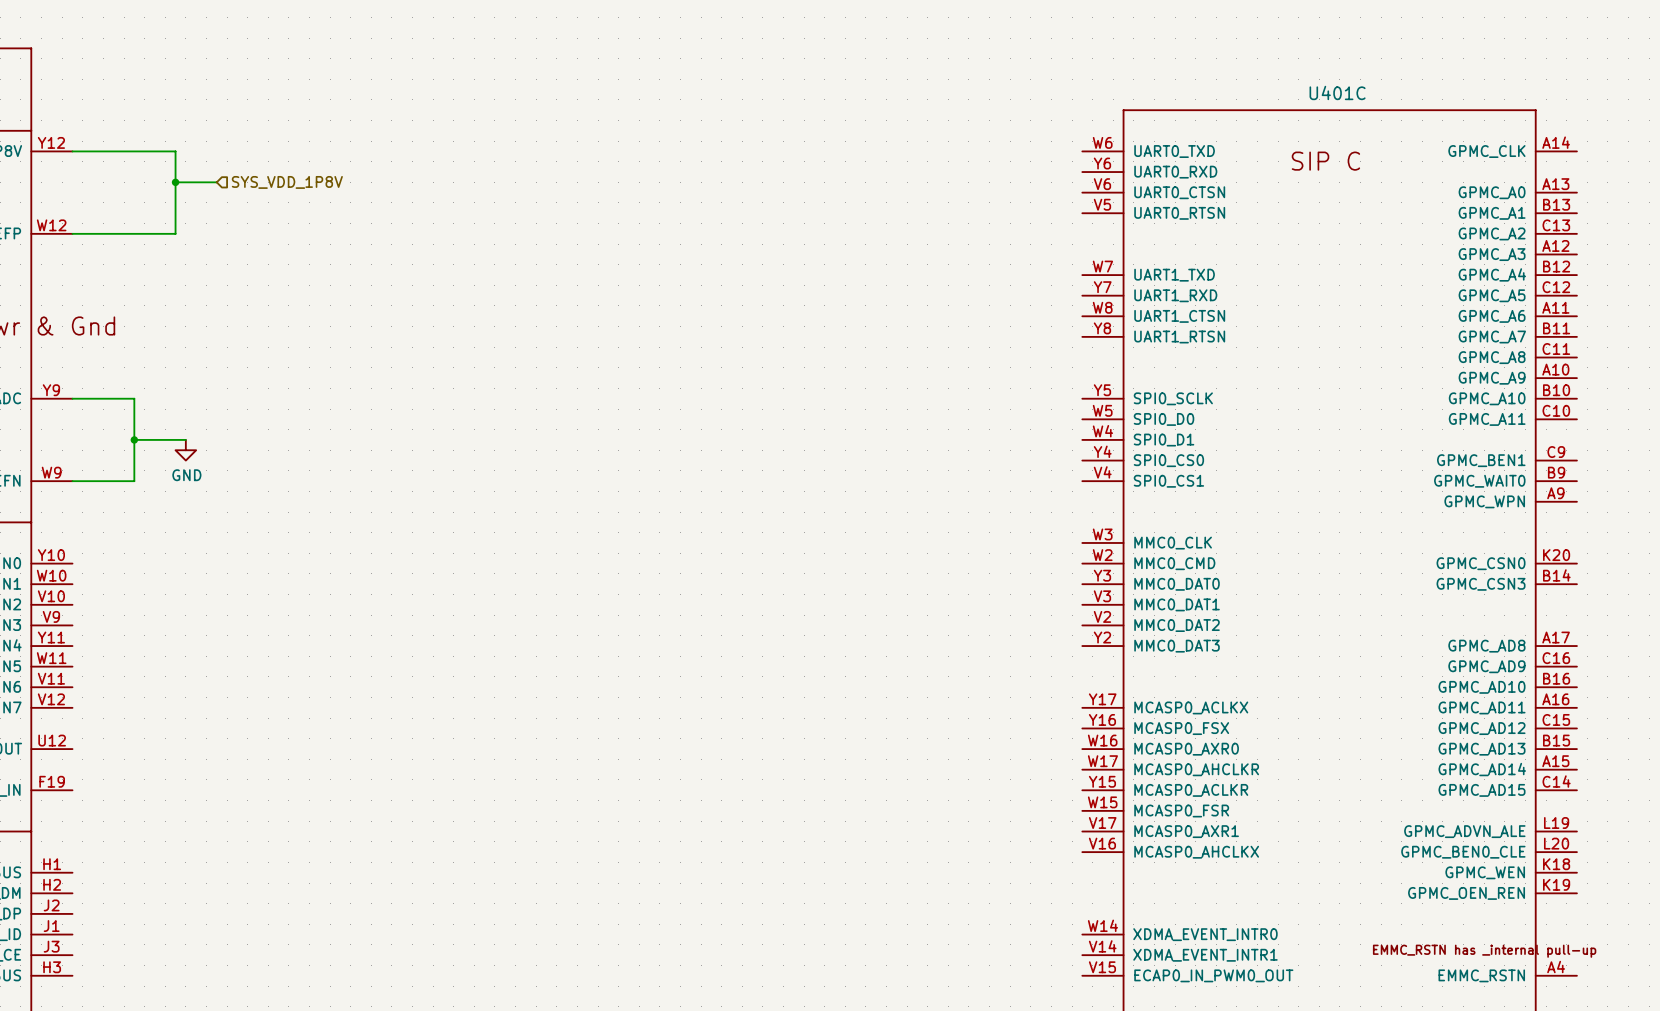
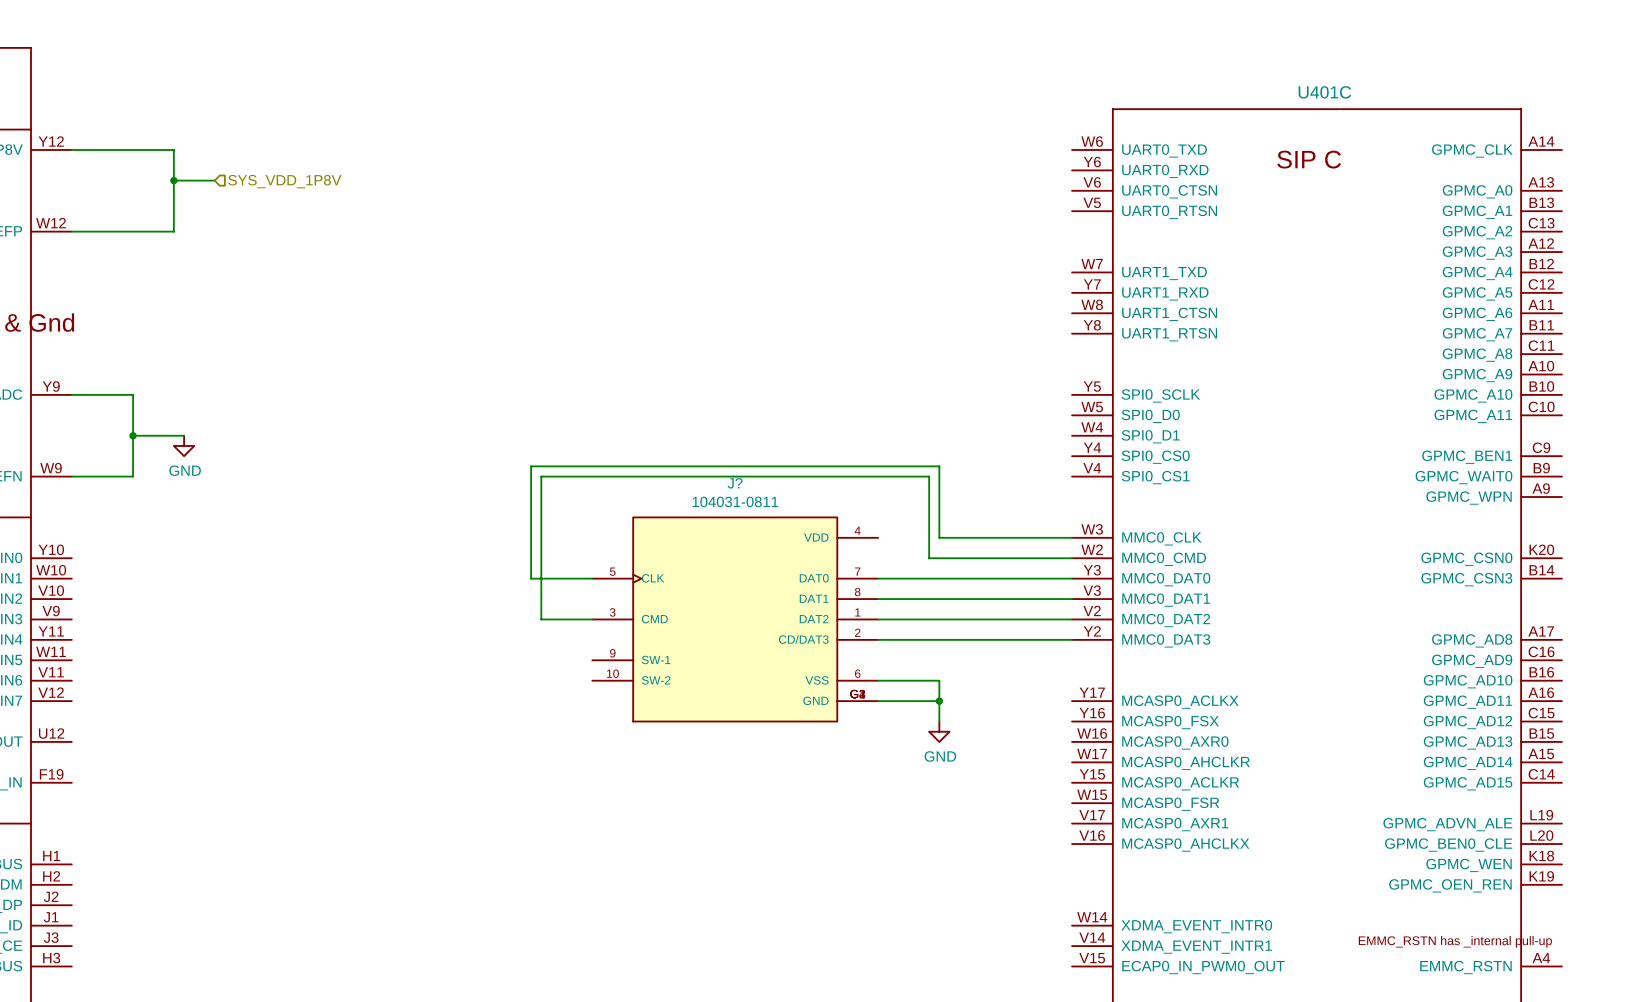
wire: none -> (1072, 537) (939, 537) (939, 466) (531, 466) (531, 578) (592, 578)
wire: none -> (1072, 558) (929, 558) (929, 476) (541, 476) (541, 619) (592, 619)
wire: none -> (878, 578) (1072, 578)
wire: none -> (878, 599) (1072, 599)
J?: none -> 104031-0811 (735, 619)
wire: none -> (878, 619) (1072, 619)
wire: none -> (878, 639) (1072, 639)
wire: none -> (878, 680) (939, 680) (939, 721)
wire: none -> (878, 701) (939, 701)
junction: none -> (939, 701)
power symbol: none -> GND (939, 731)

